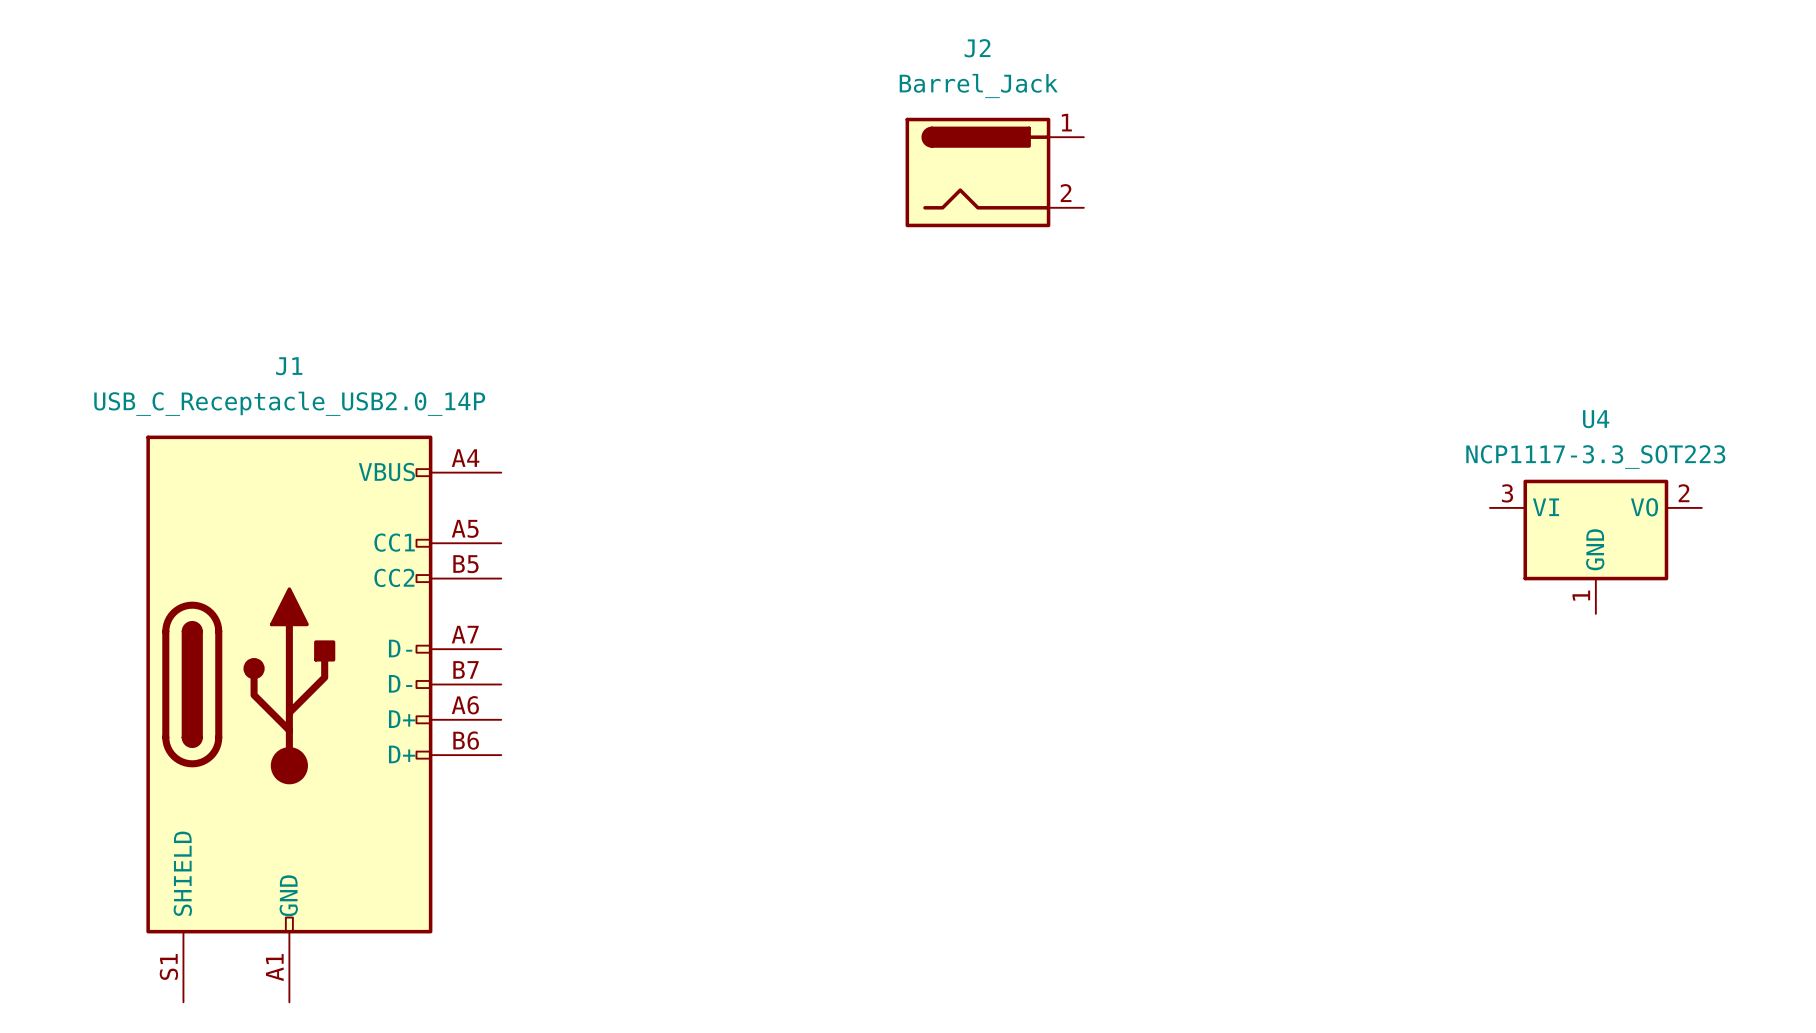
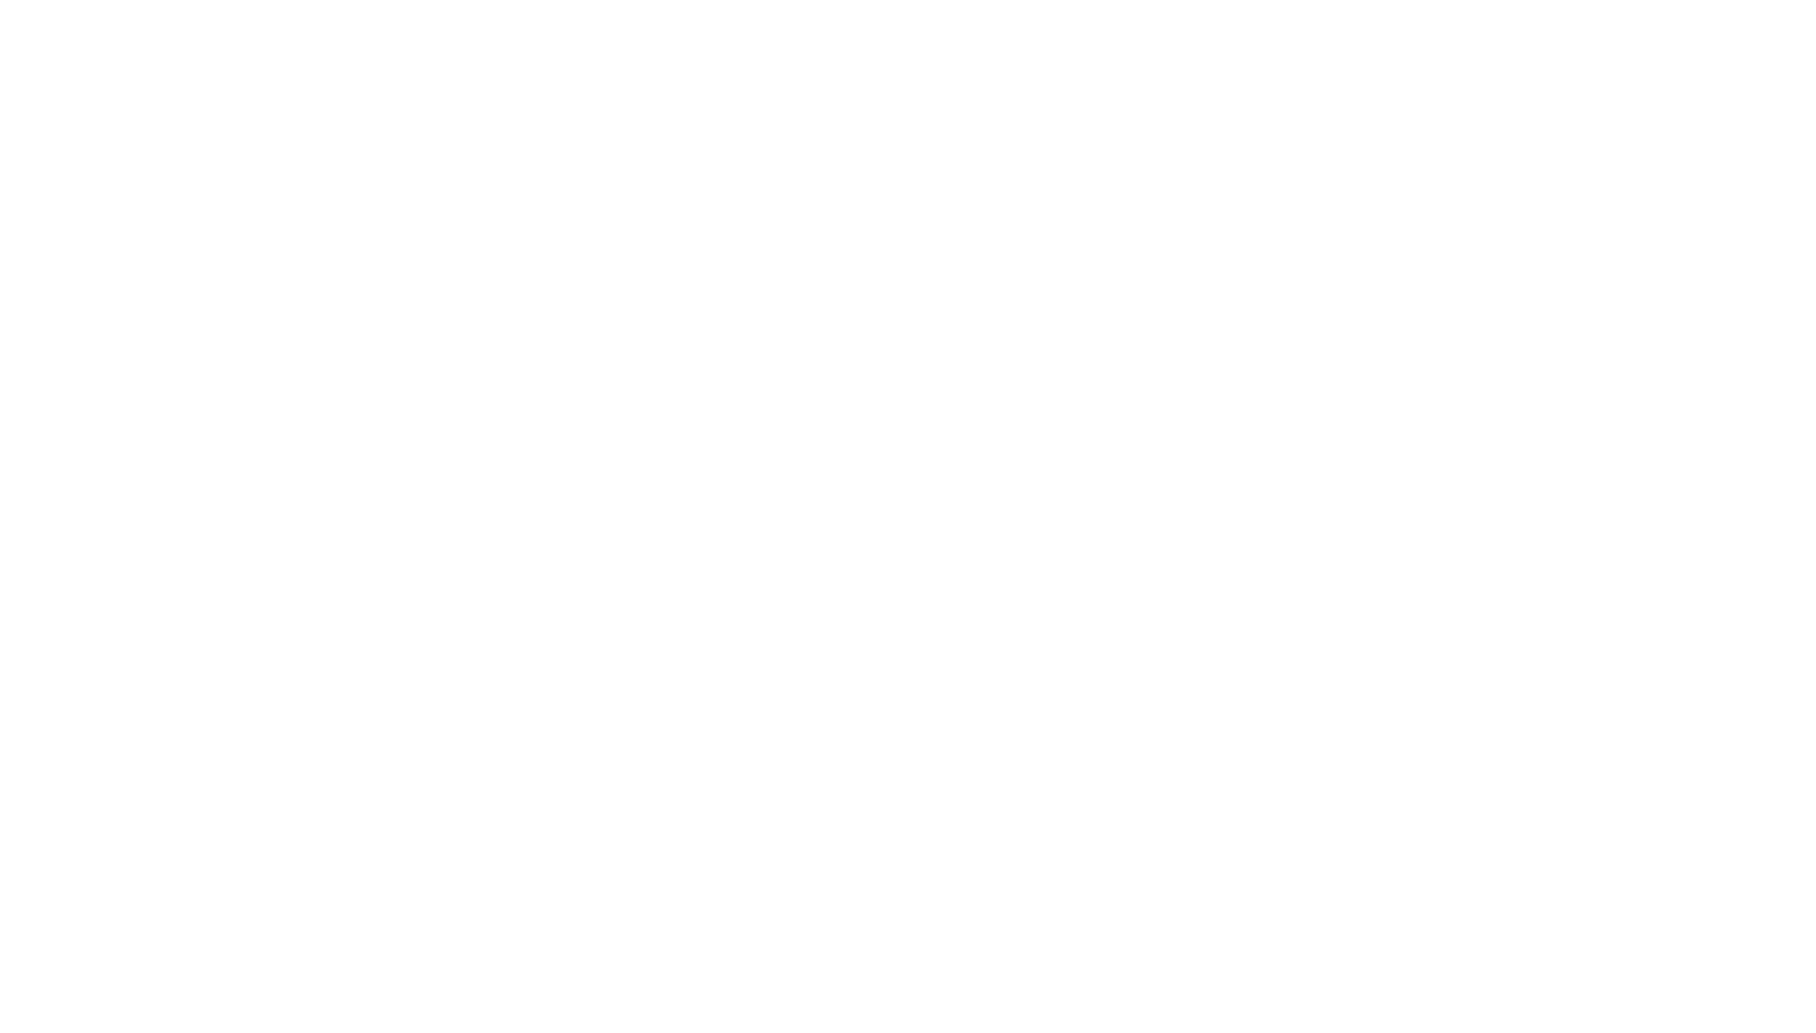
J2: Barrel_Jack (994, 172) -> none
U4: NCP1117-3.3_SOT223 (1595, 546) -> none
J1: USB_C_Receptacle_USB2.0_14P (323, 718) -> none

